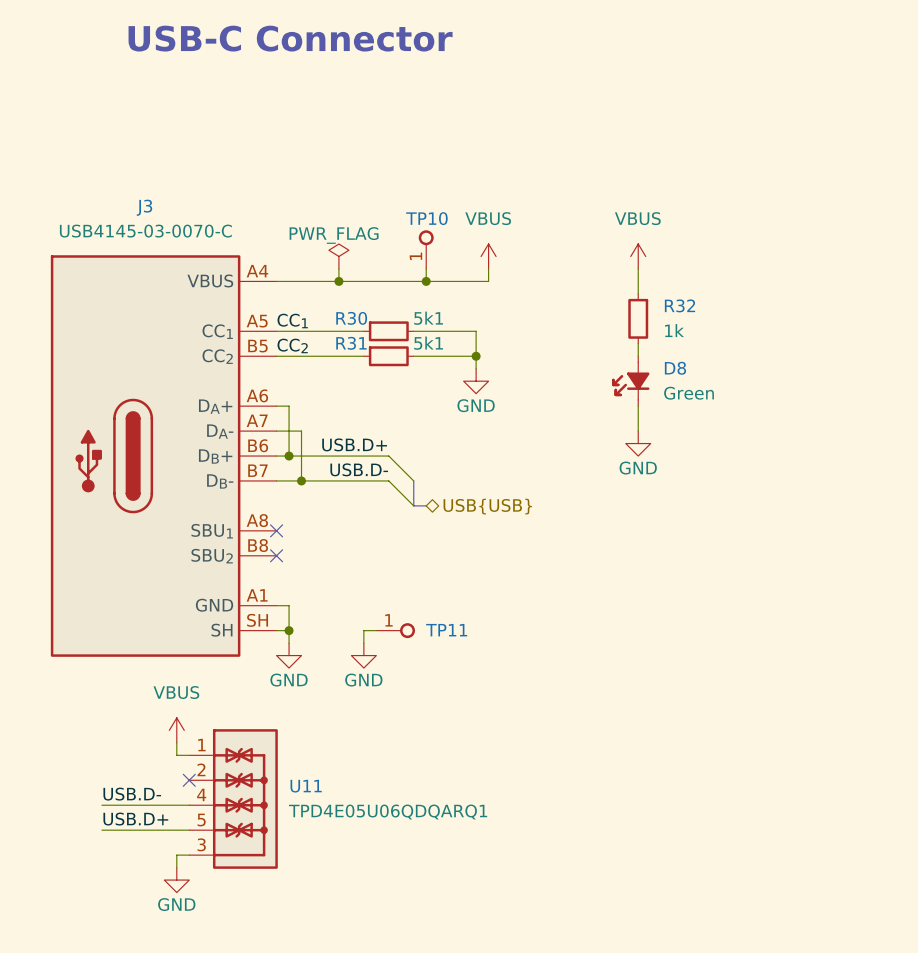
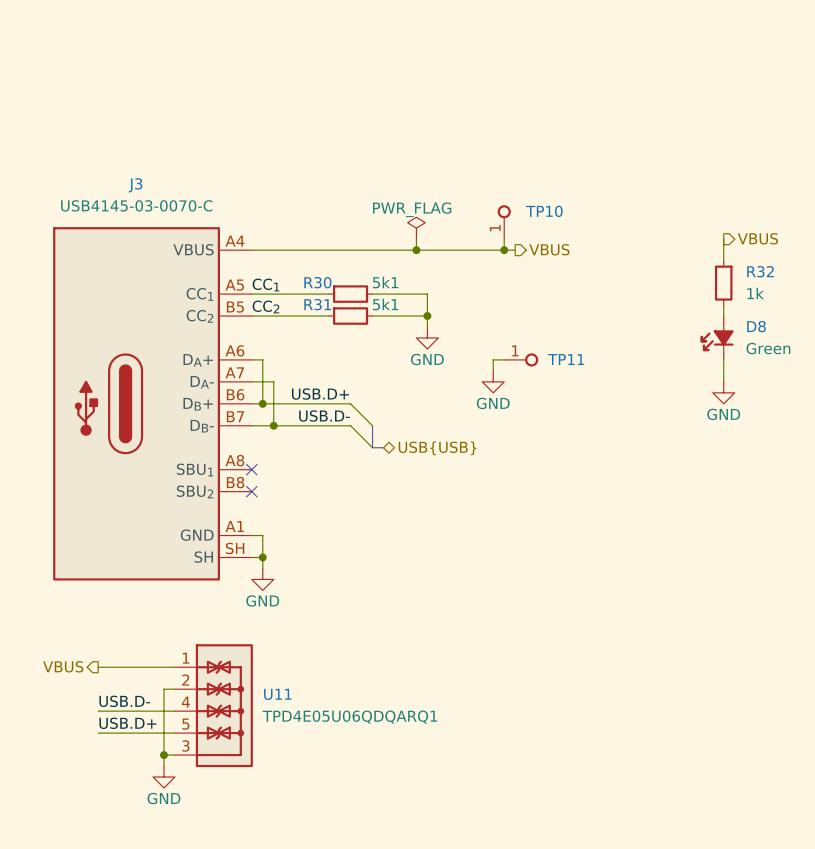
text: USB-C Connector (290, 38) -> none
TP10 name position: TP10 (426, 218) -> TP10 (544, 211)
TP10 position: (426, 249) -> (504, 222)
power symbol position: PWR_FLAG (338, 256) -> PWR_FLAG (416, 228)
power symbol: VBUS (488, 256) -> none
power symbol: VBUS (638, 256) -> none
wire: (338, 268) (338, 281) -> (504, 239) (504, 250)
wire: (426, 268) (426, 281) -> (416, 239) (416, 250)
wire: (488, 268) (488, 281) -> (515, 250) (438, 250)
wire: (638, 268) (638, 293) -> (723, 239) (723, 261)
hierarchical label: none -> VBUS (757, 238)
hierarchical label: none -> VBUS (549, 249)
junction: (338, 281) -> none
junction position: (426, 281) -> (416, 250)
junction: none -> (504, 250)
R32 position: (638, 318) -> (723, 283)
wire: (638, 343) (638, 356) -> (723, 305) (723, 316)
D8 position: (630, 381) -> (717, 337)
wire: none -> (504, 359) (493, 359) (493, 370)
wire: (638, 406) (638, 431) -> (723, 359) (723, 381)
power symbol: none -> GND (493, 381)
power symbol: GND (638, 443) -> none
power symbol: none -> GND (723, 392)
wire: (376, 630) (363, 630) (363, 643) -> none
TP11 position: (395, 630) -> (521, 359)
power symbol: GND (363, 655) -> none
power symbol: VBUS (176, 730) -> none
wire: (176, 742) (176, 755) -> (98, 667) (163, 667)
hierarchical label: none -> VBUS (63, 666)
wire: none -> (174, 689) (163, 689) (163, 755)
no-connect mark: (189, 780) -> none
junction: none -> (163, 755)

